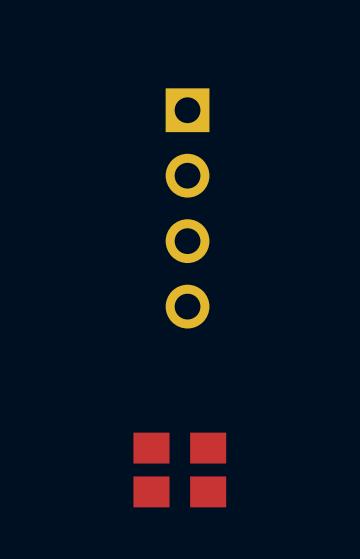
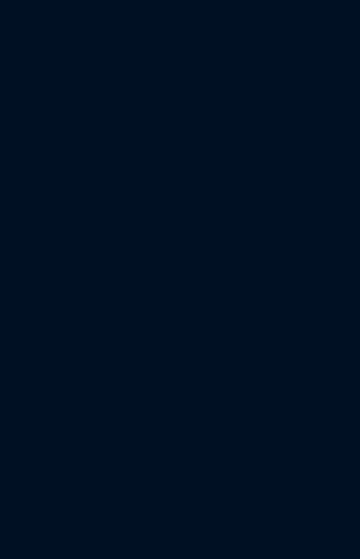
part: (187, 208) -> none
part: (179, 469) -> none

